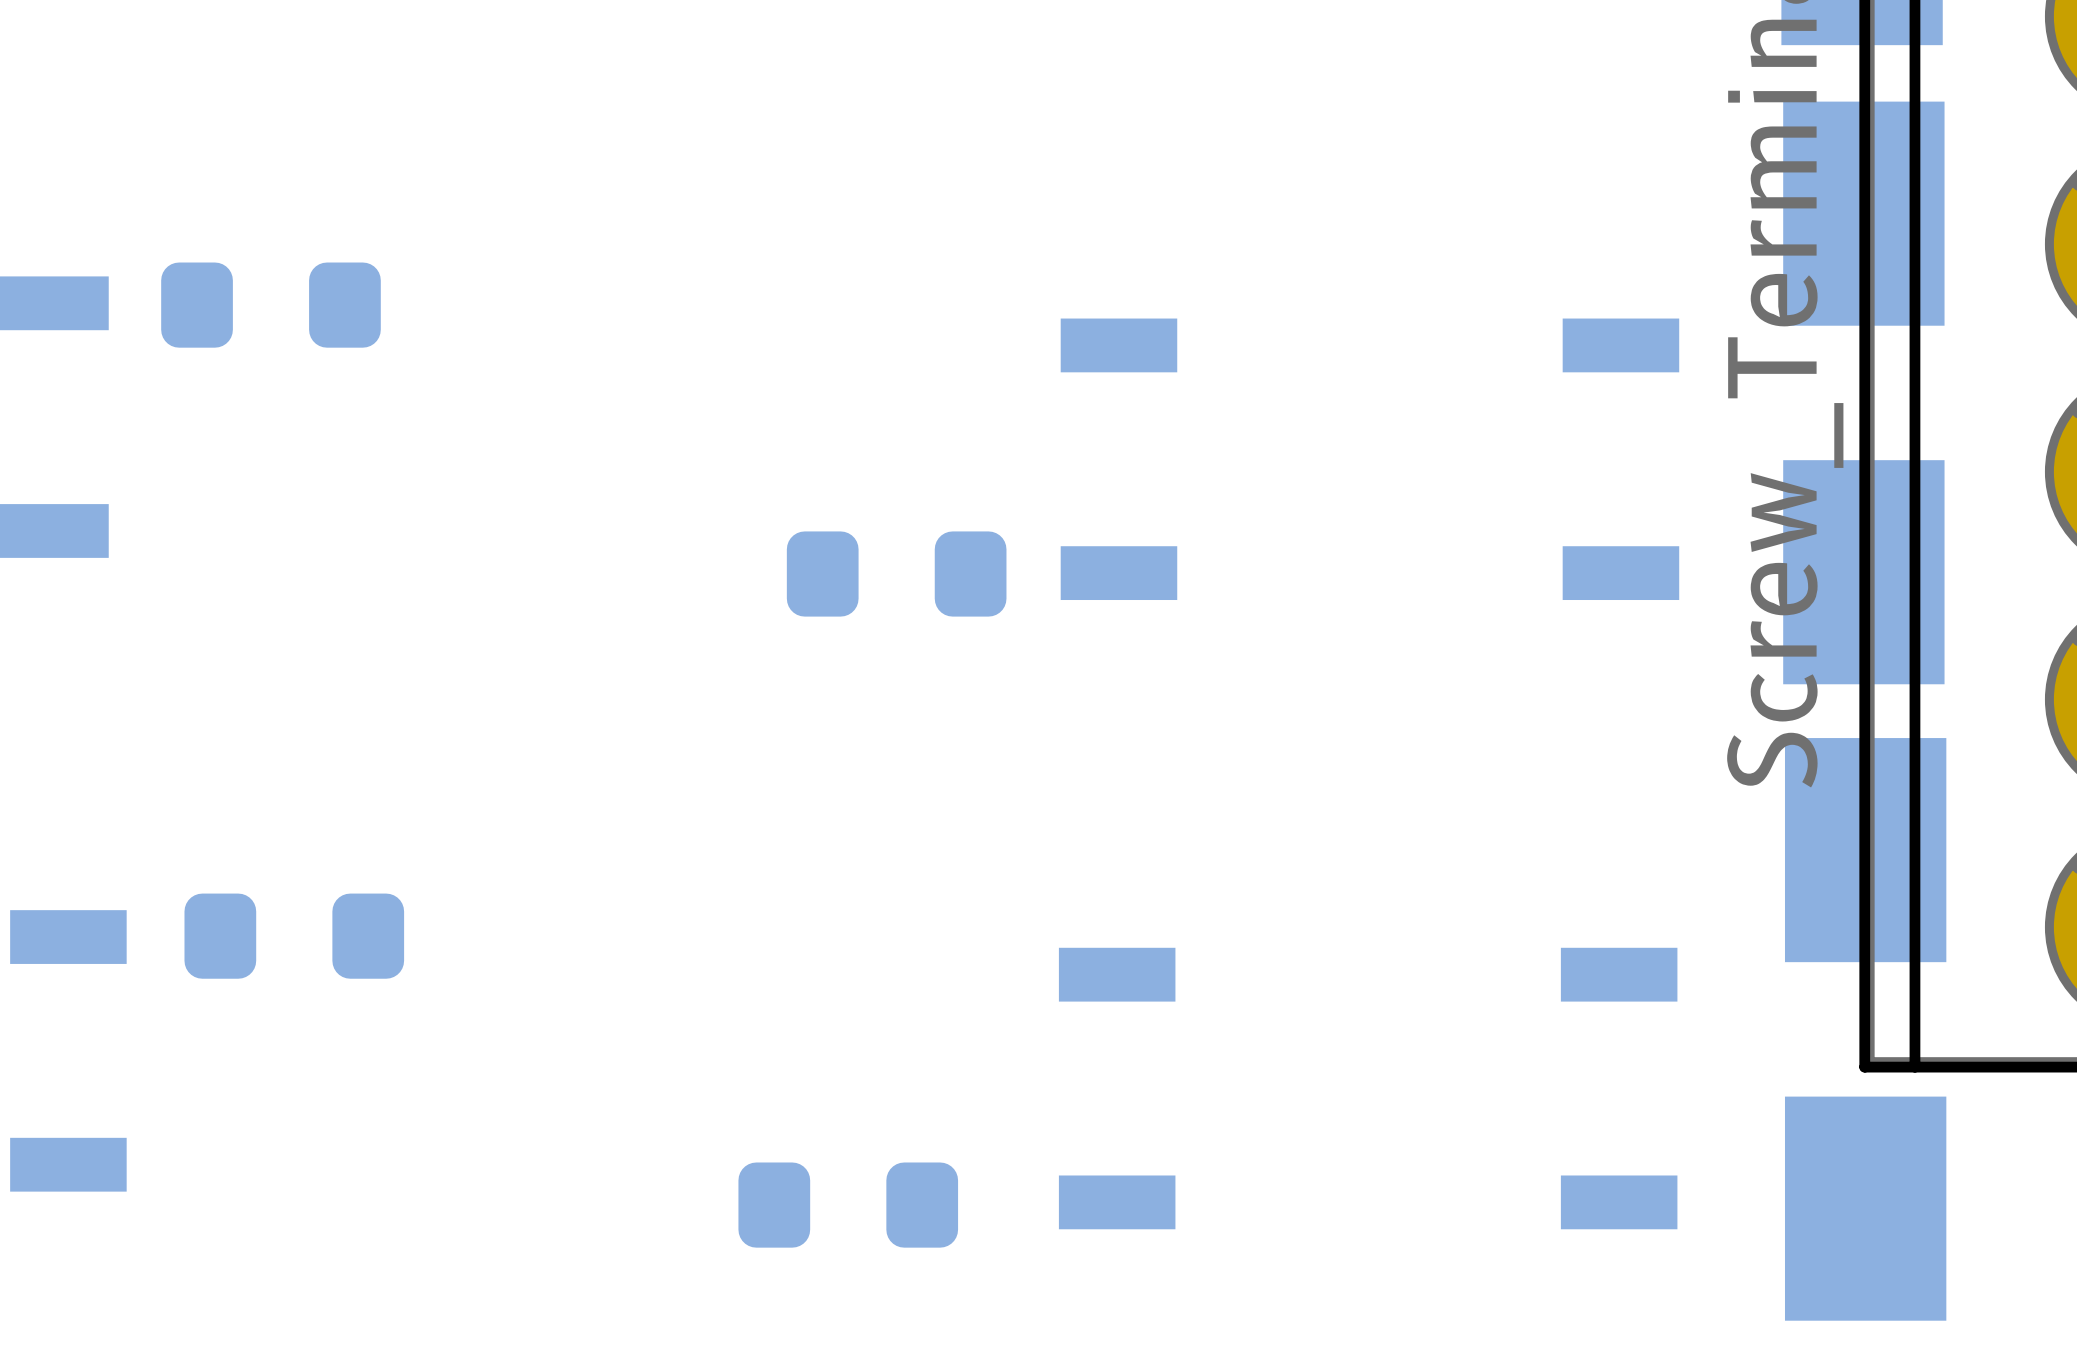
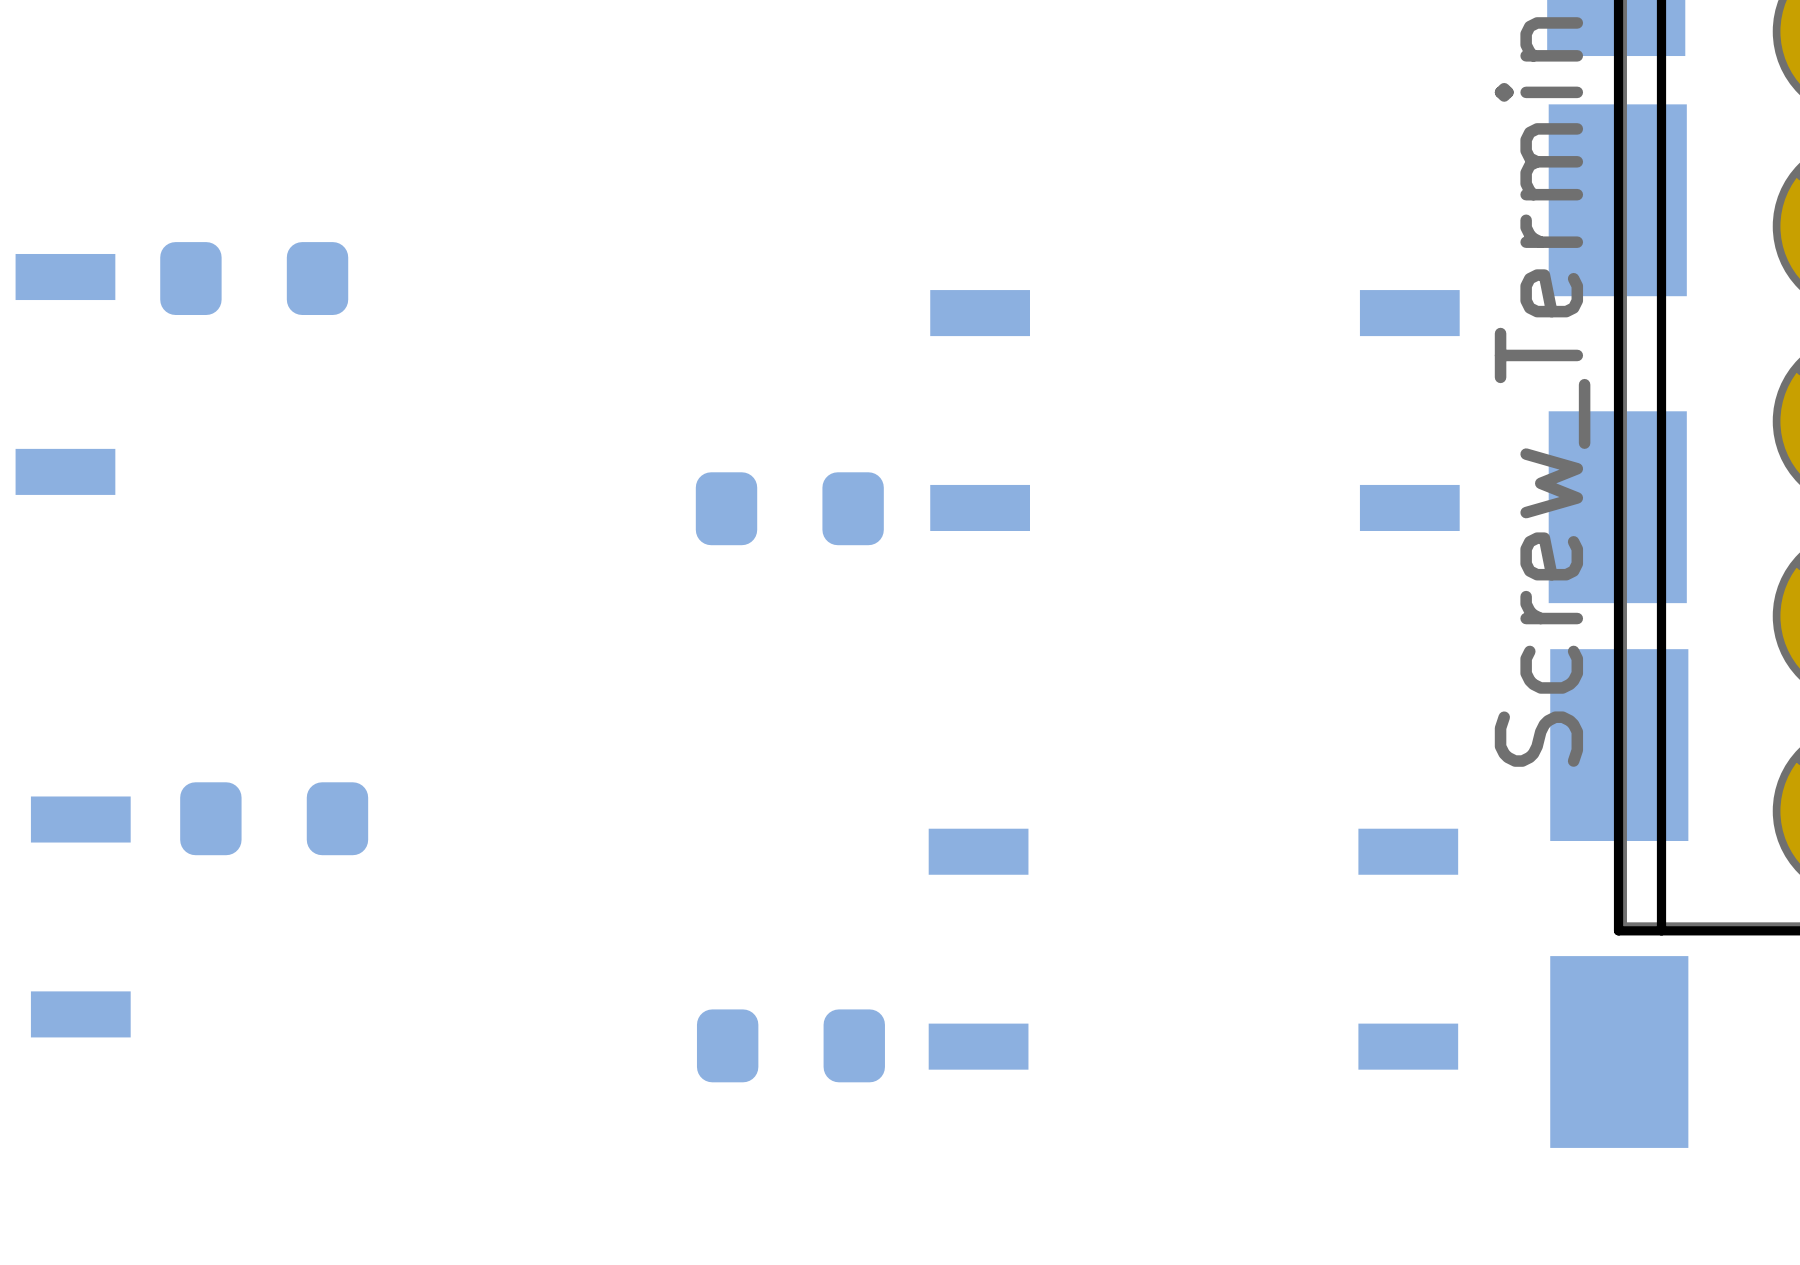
part position: (848, 1205) -> (790, 1045)

